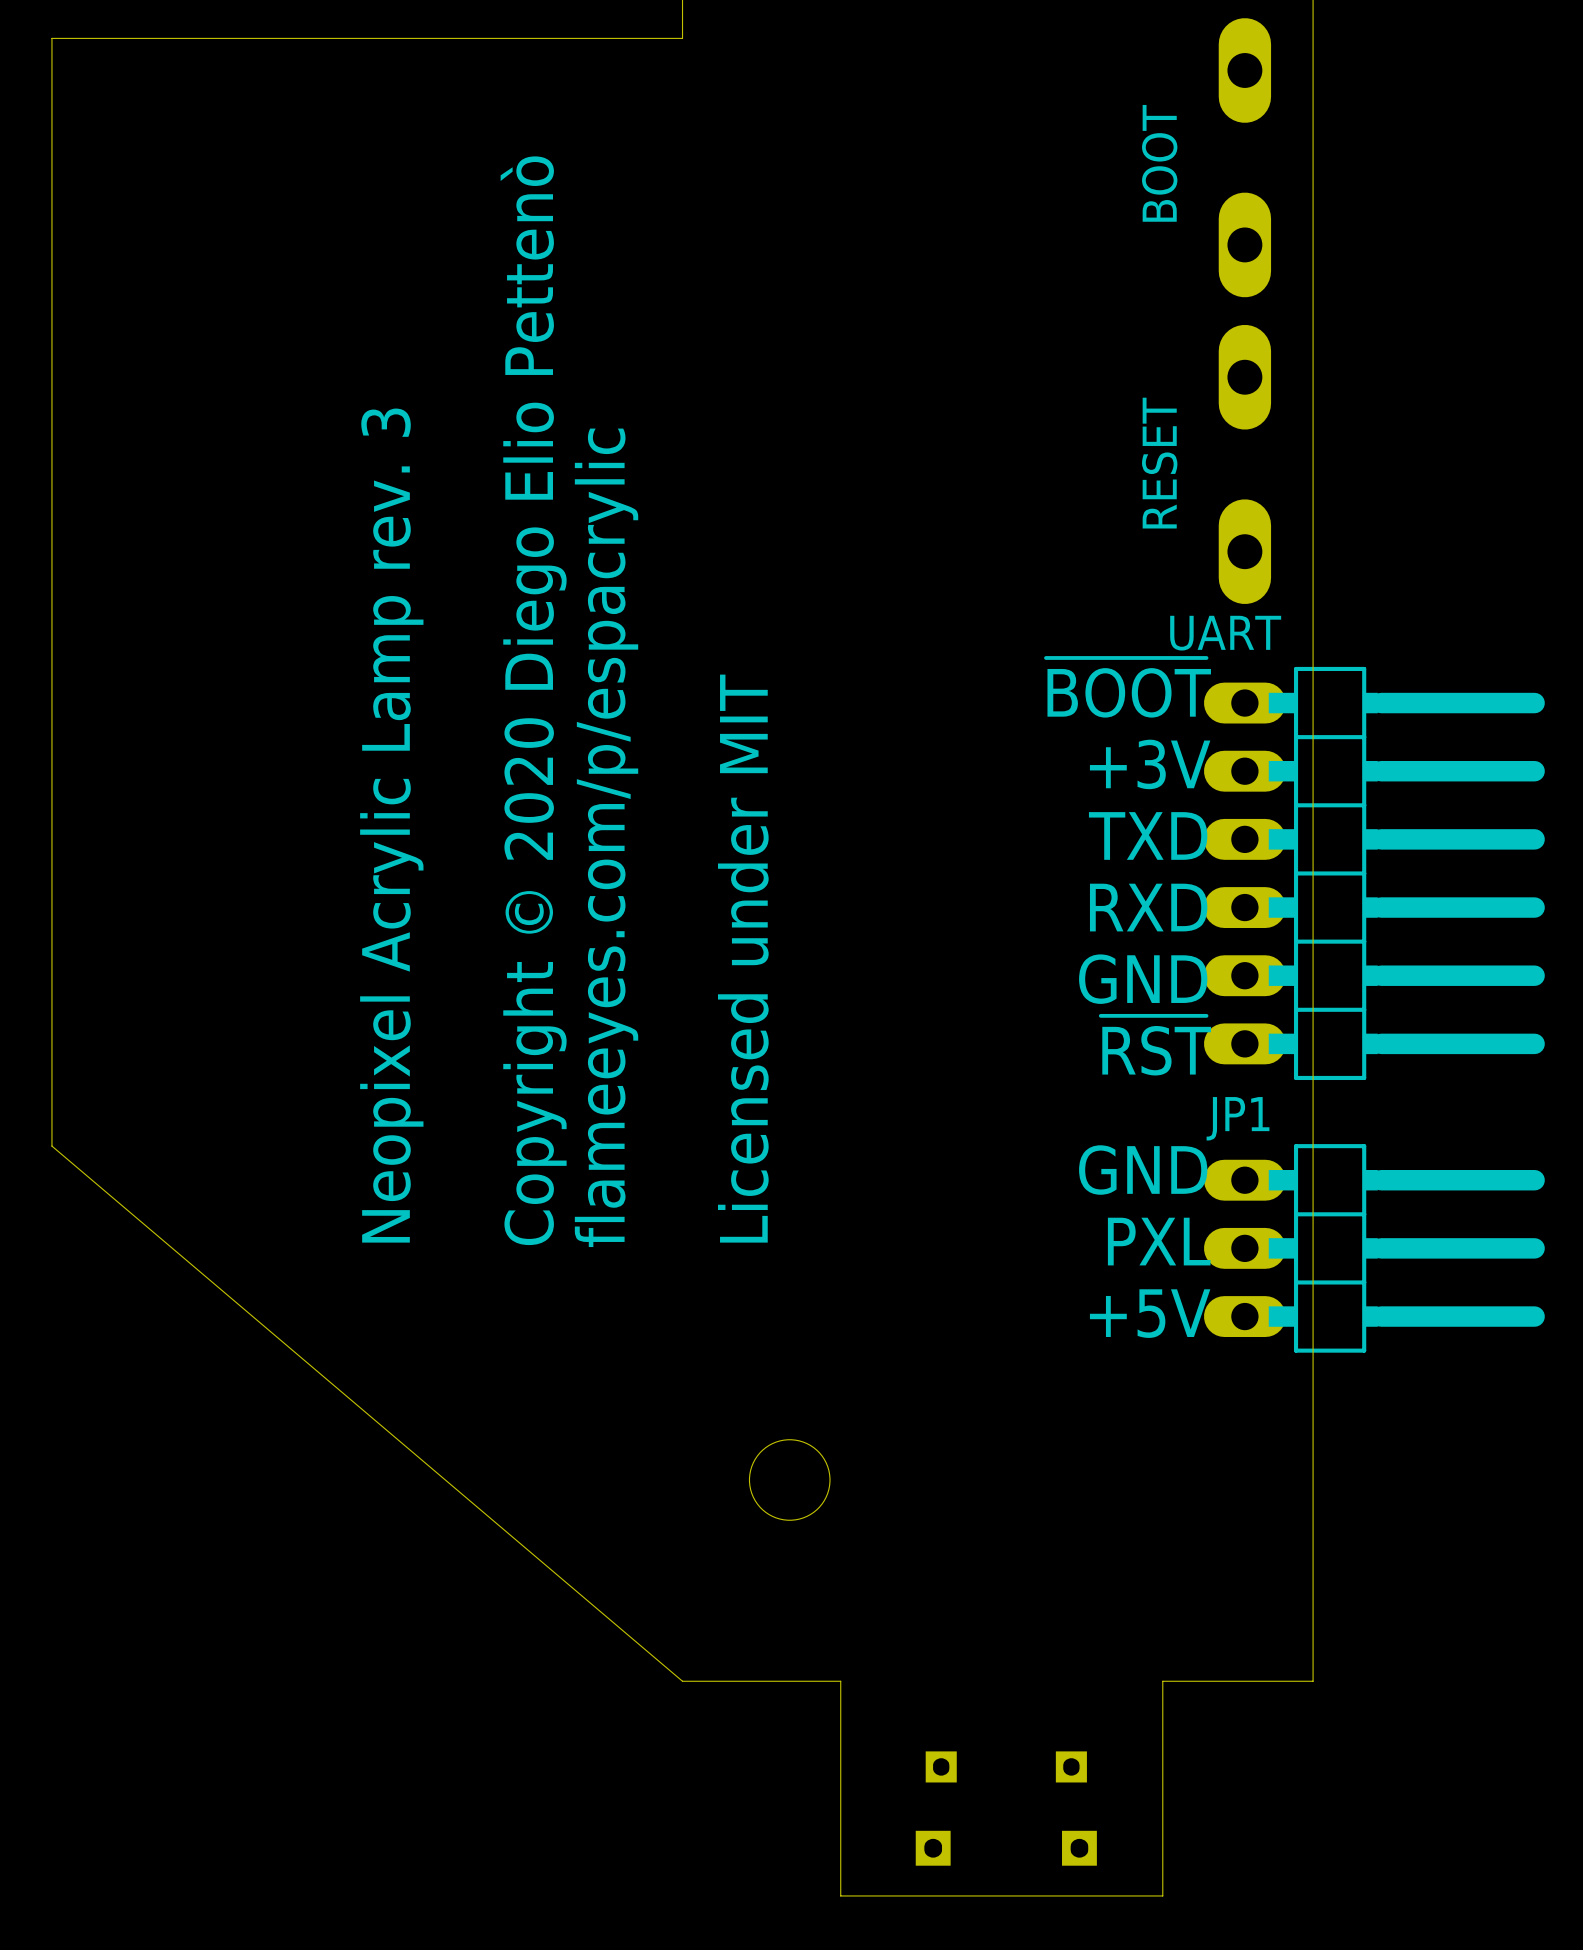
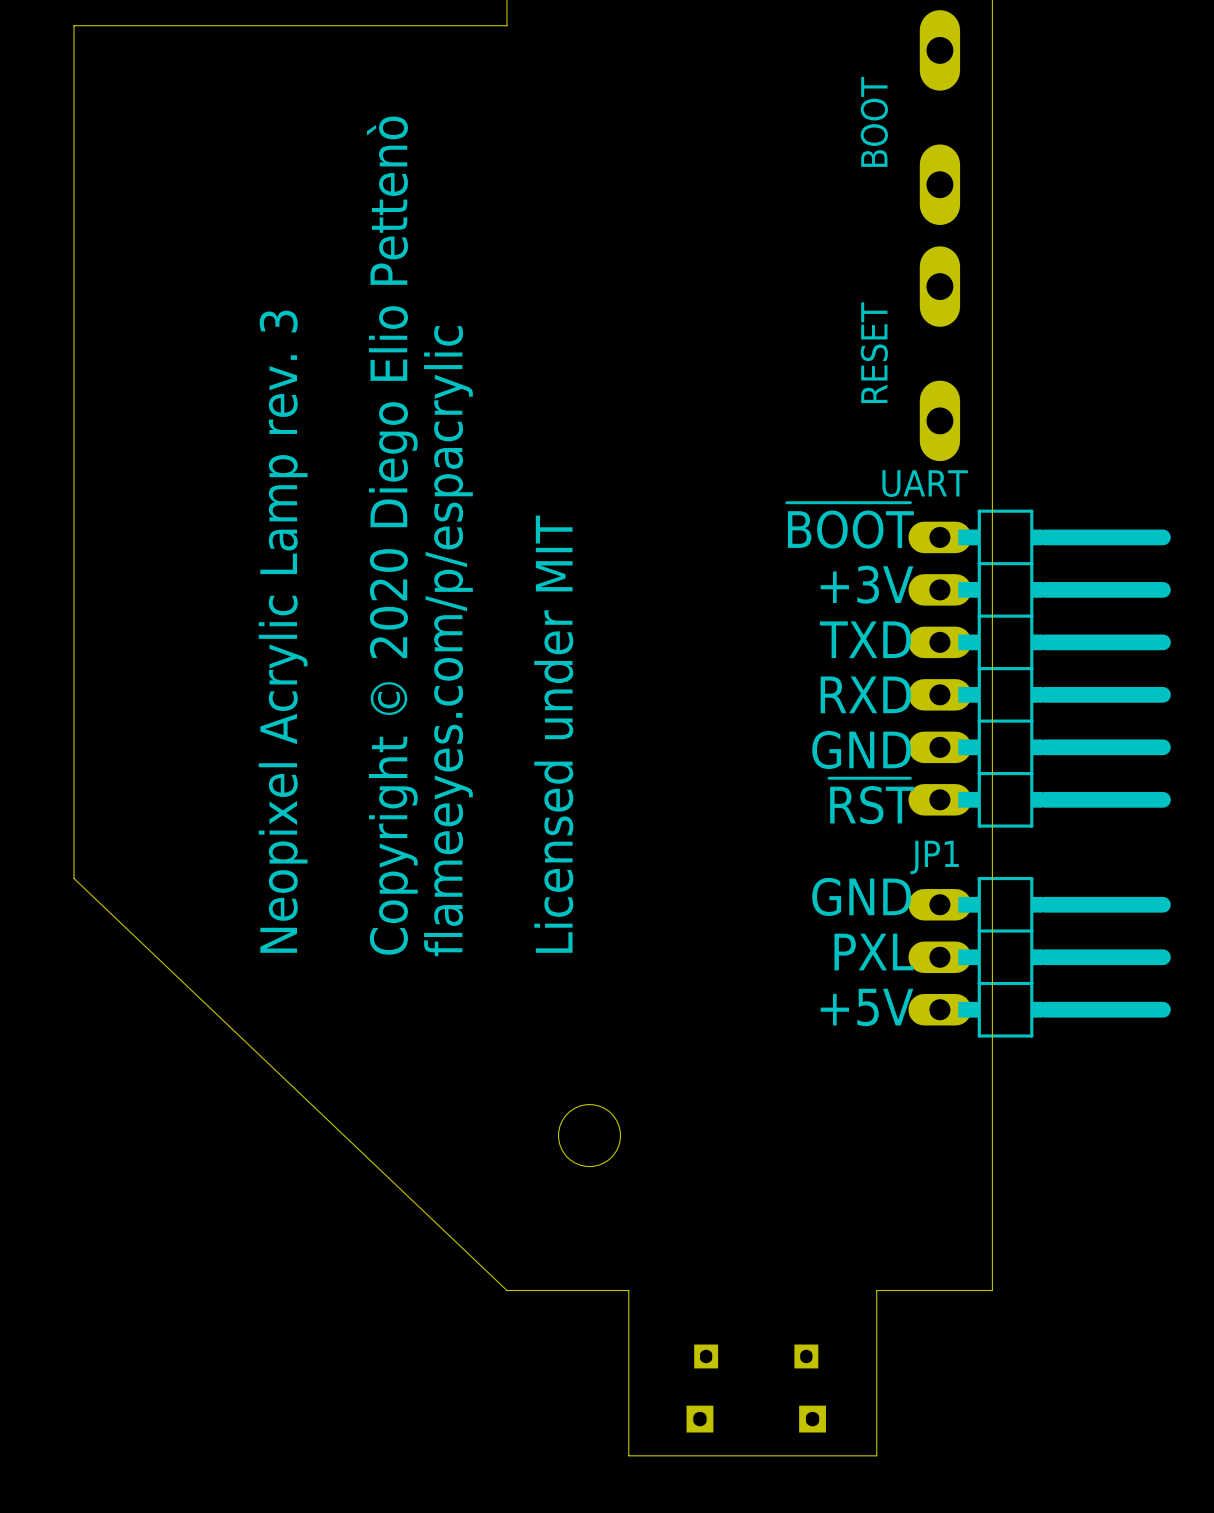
board edge: (120, 38) (51, 38) (51, 1146) (682, 1681) -> (74, 25) (74, 878) (506, 1290)

